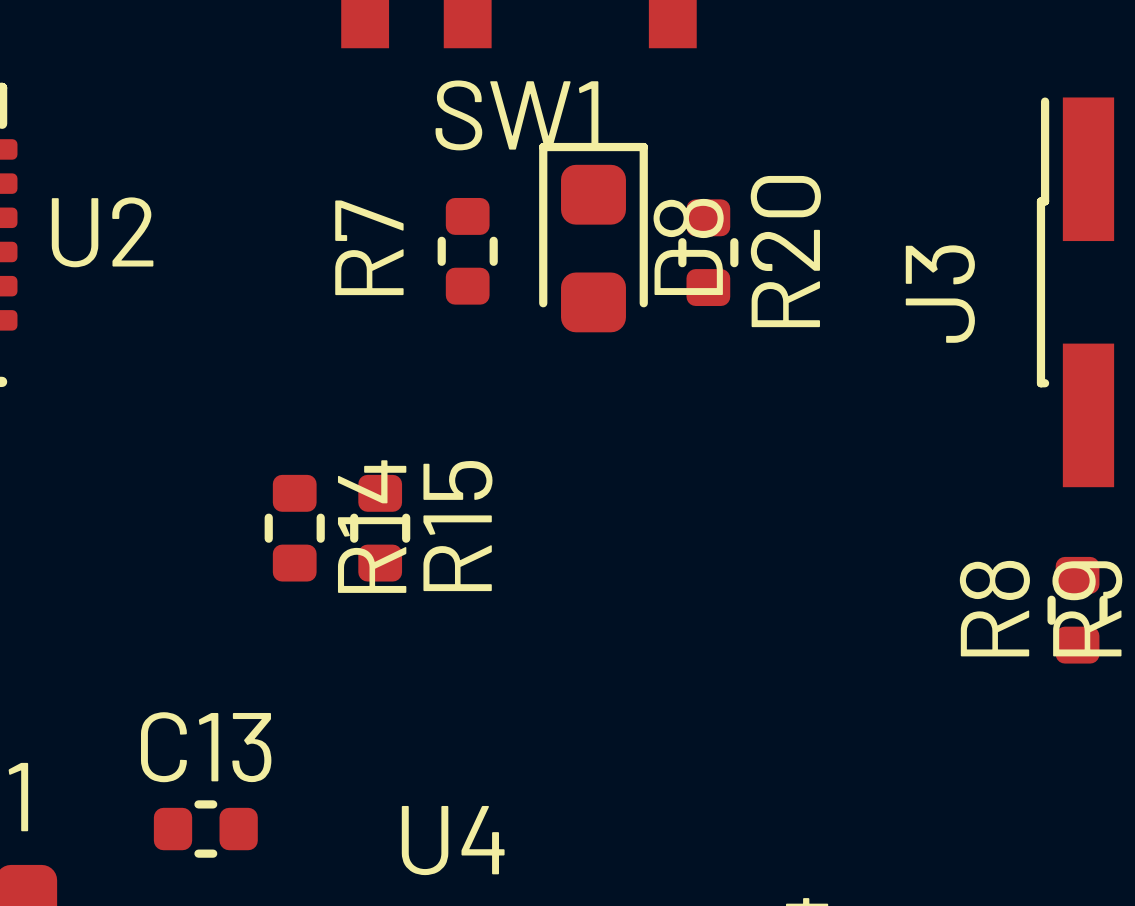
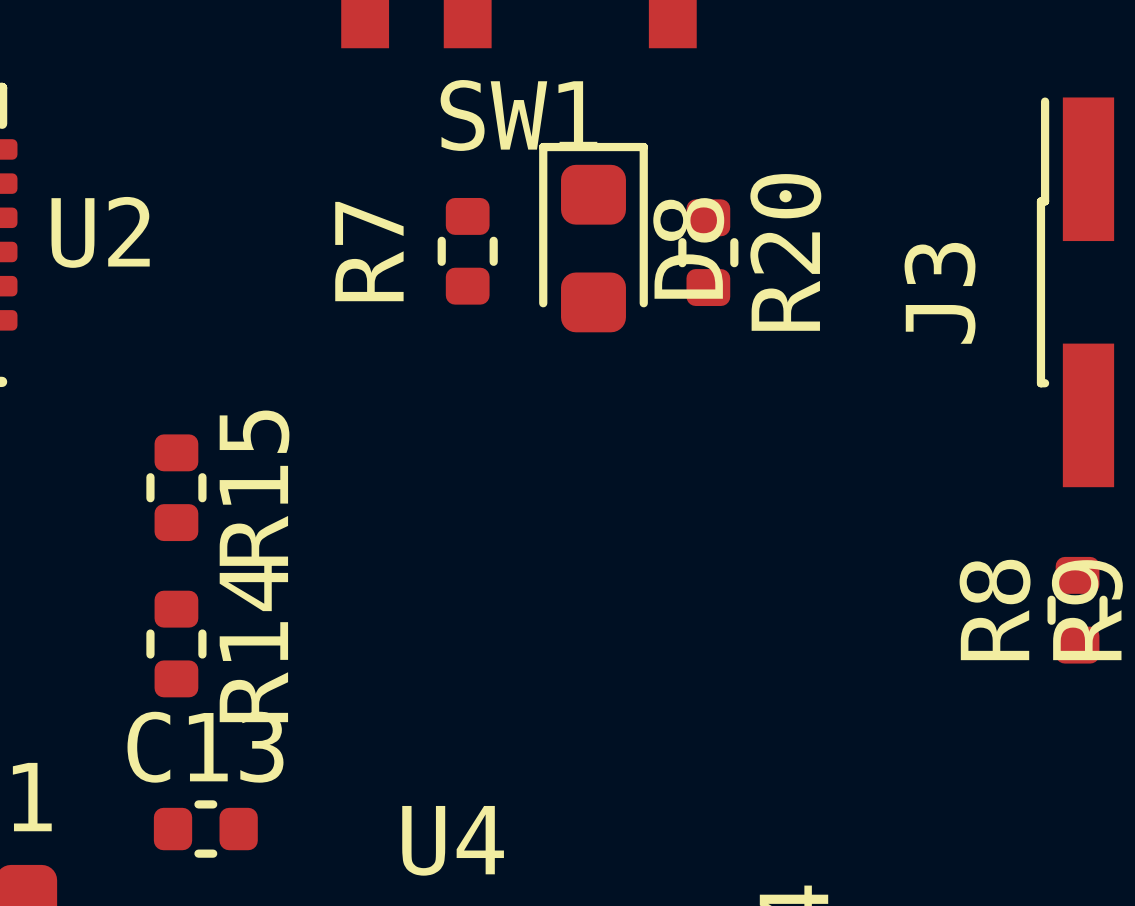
R14 position: (294, 528) -> (176, 644)
R15 position: (380, 528) -> (176, 487)

